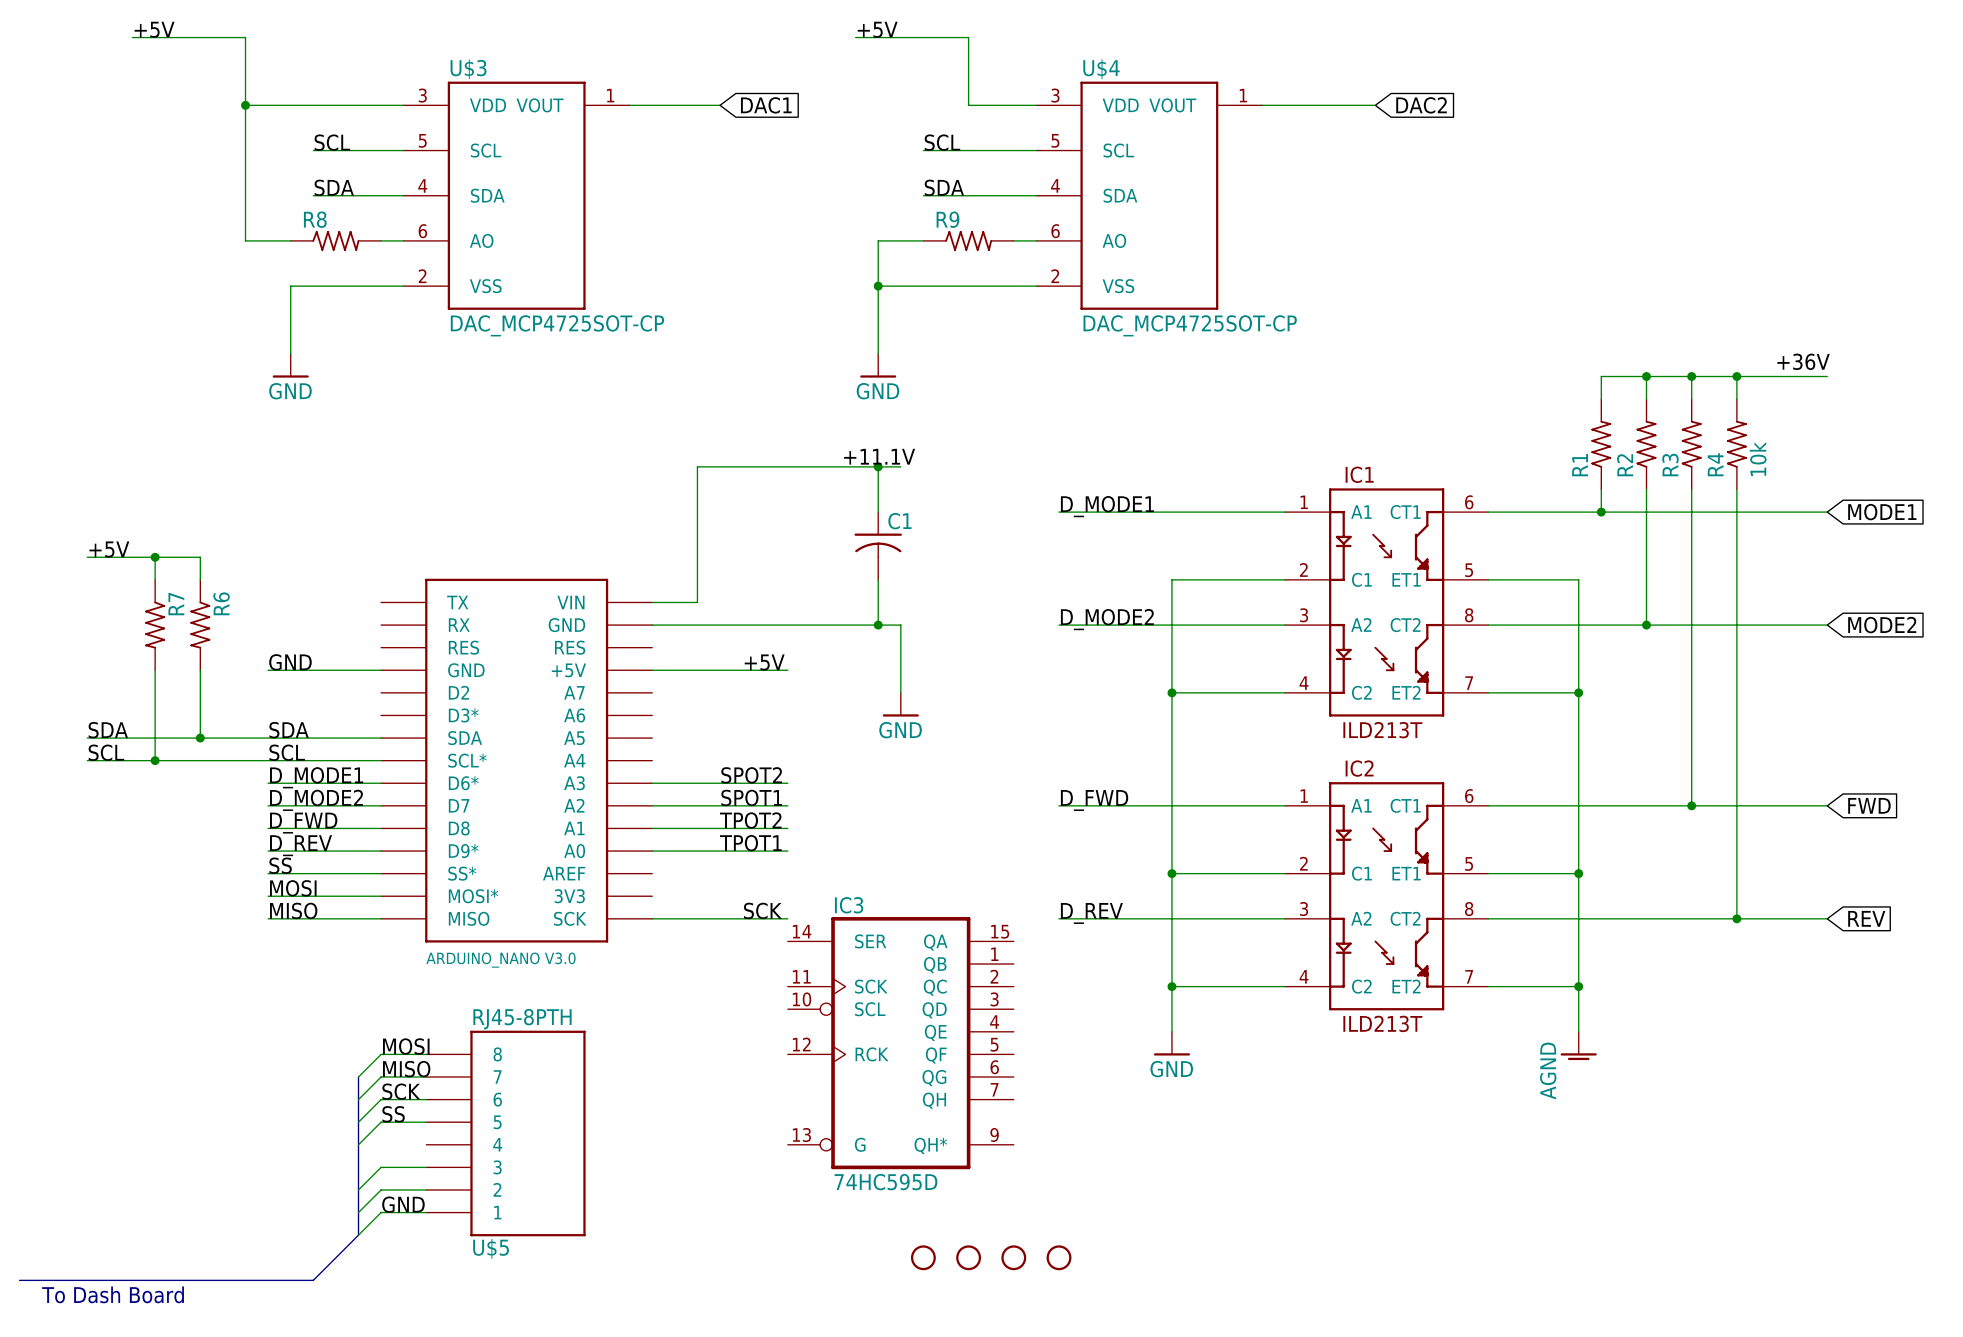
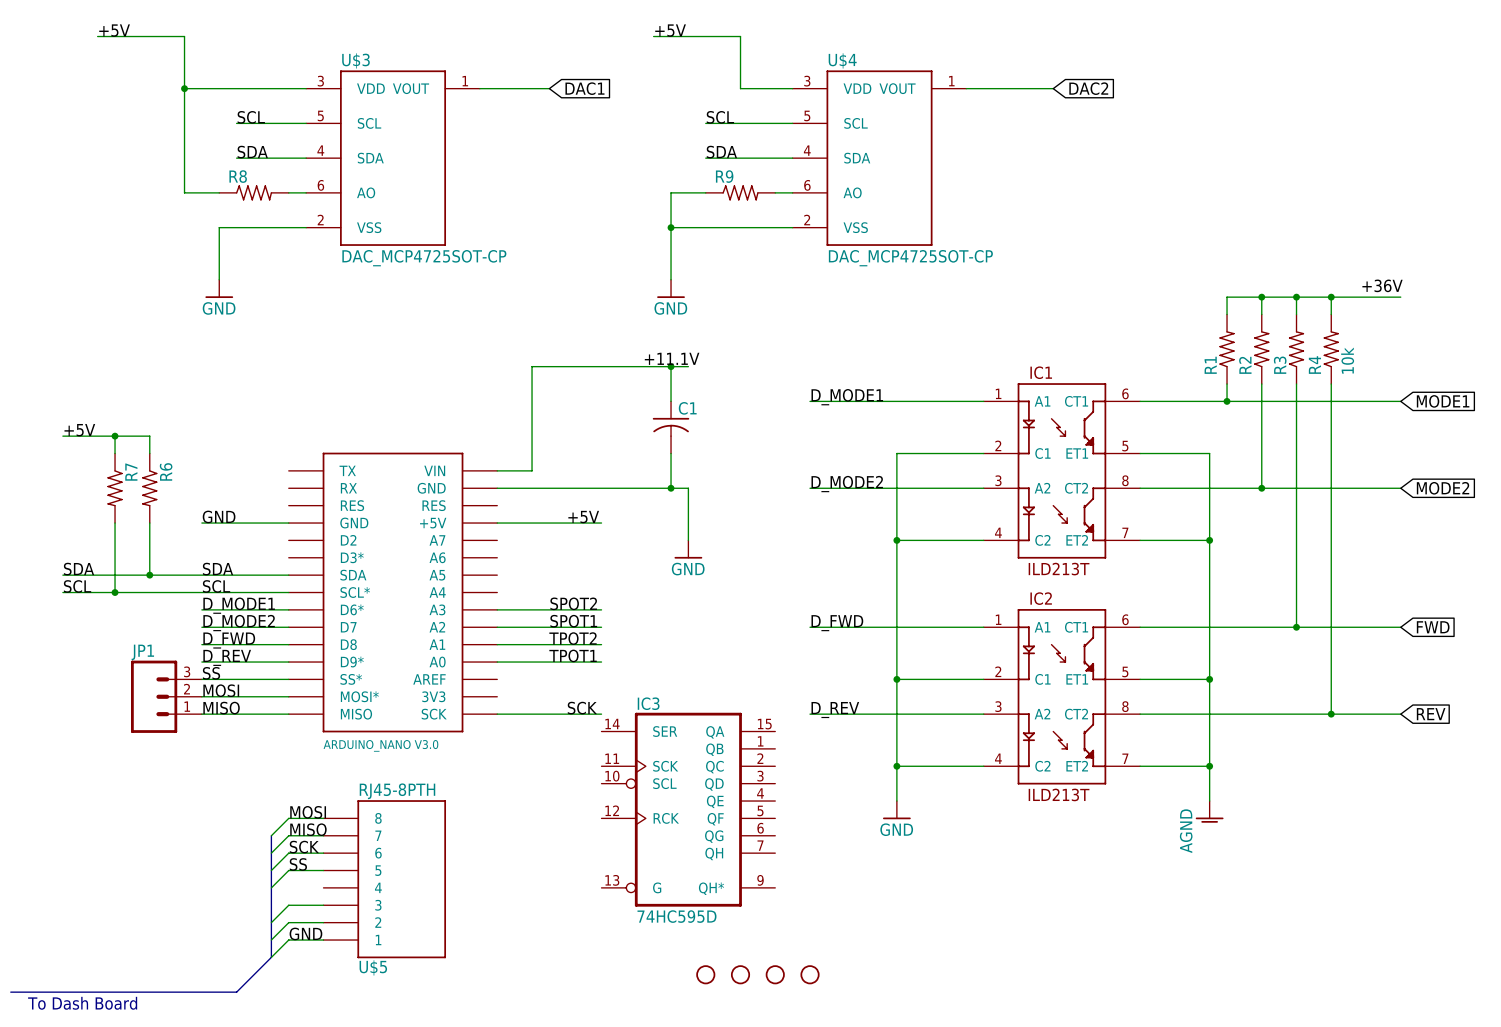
JP1: none -> (166, 696)

